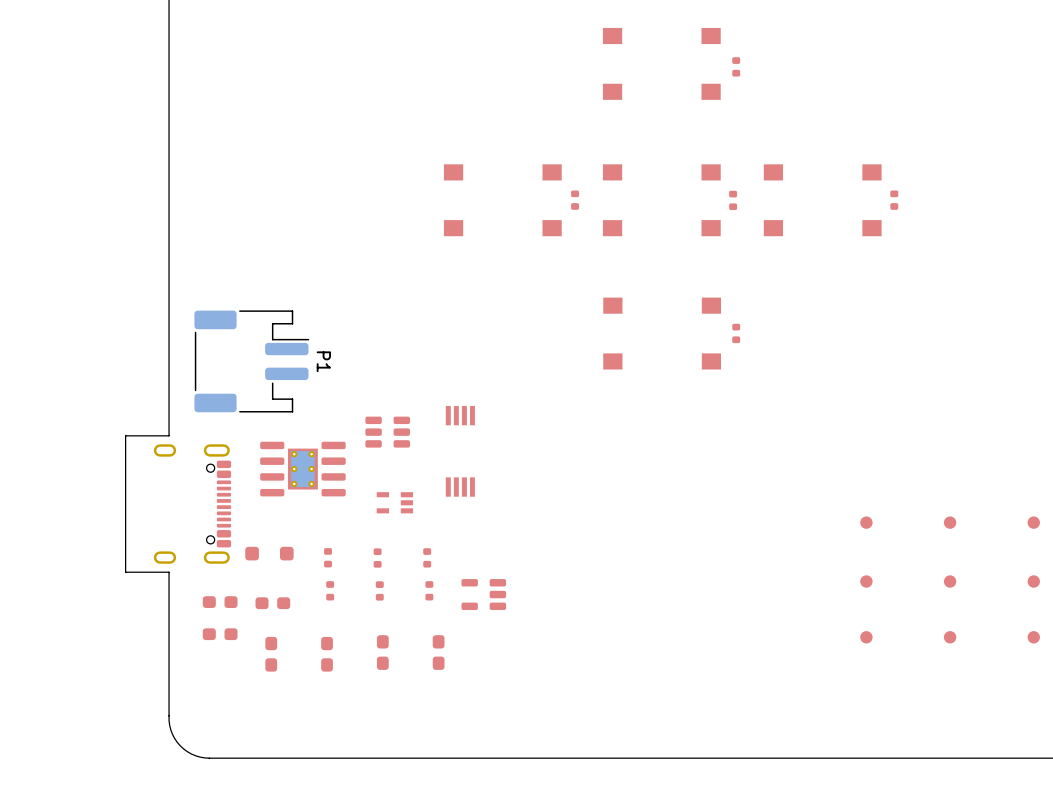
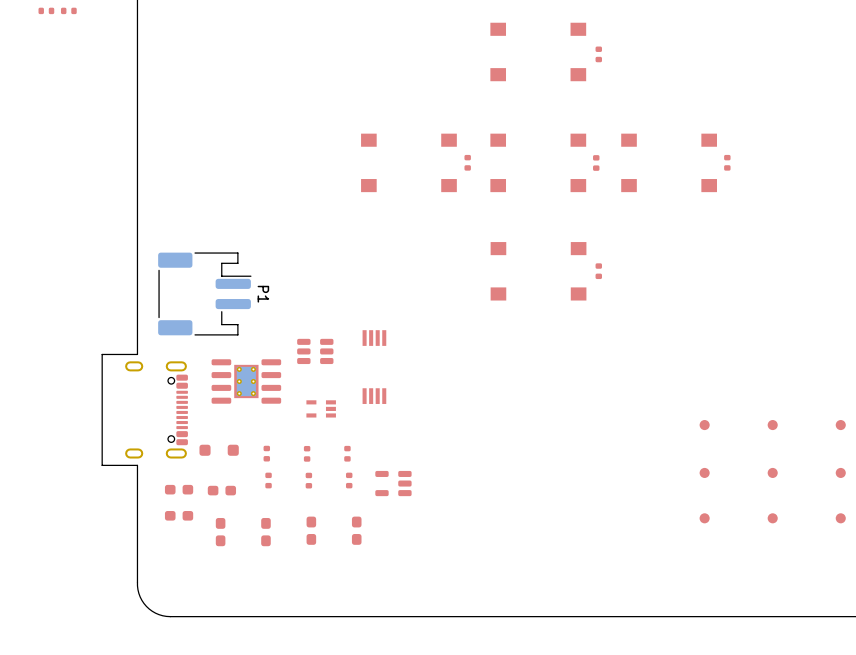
part: none -> (46, 10)
part: none -> (68, 10)

